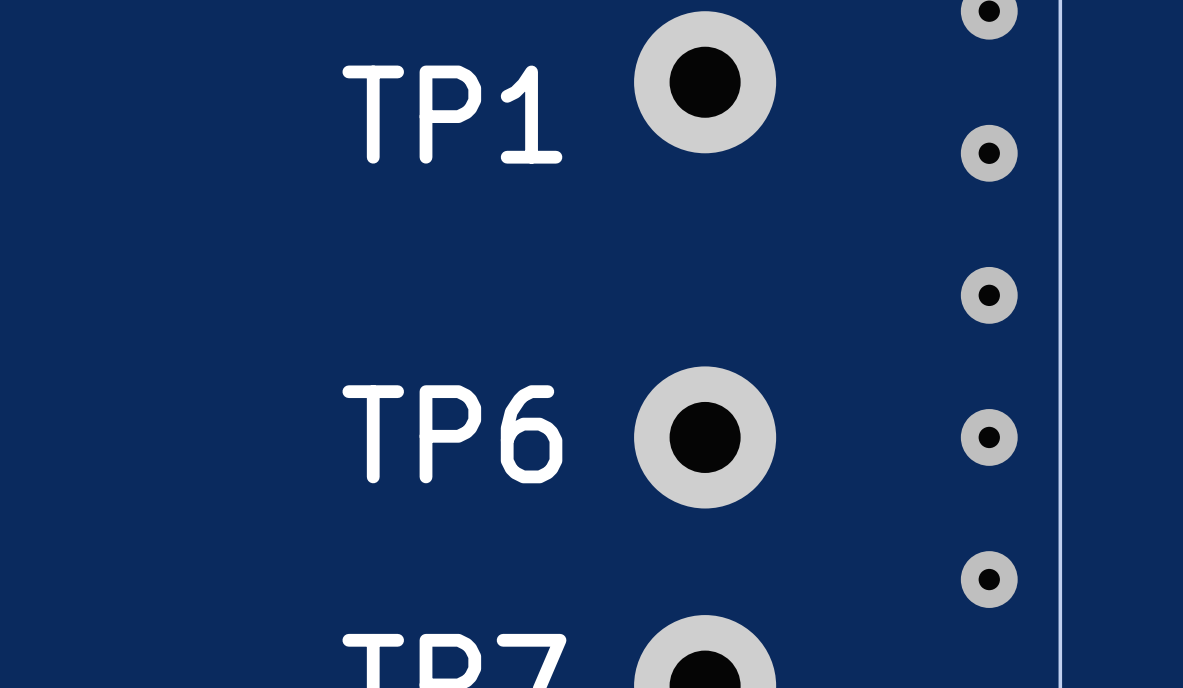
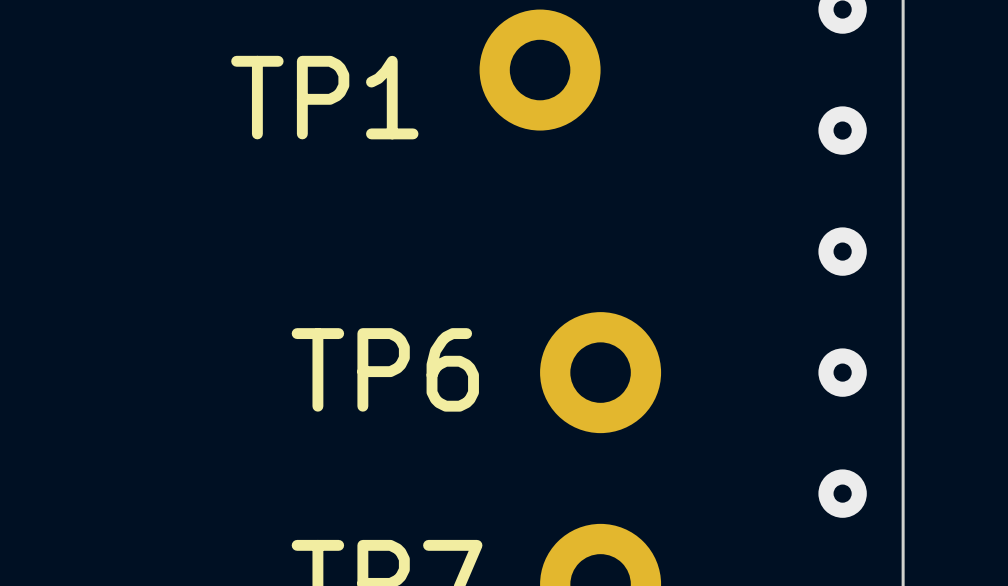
TP1 position: (705, 82) -> (540, 70)

